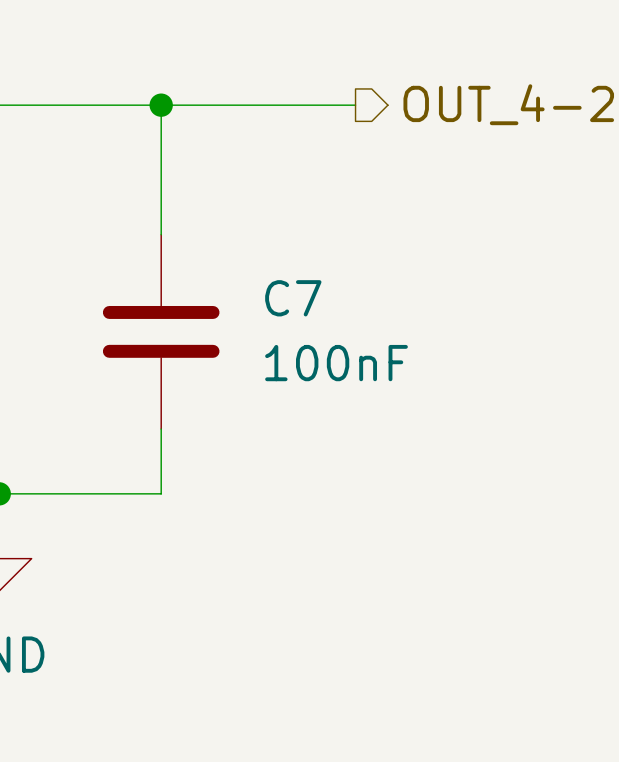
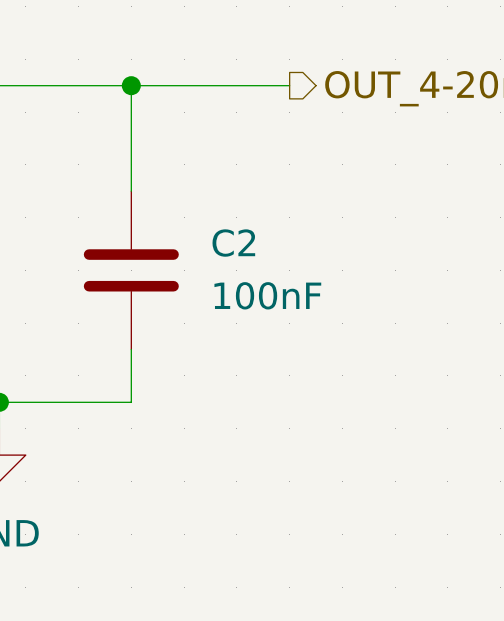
C7 name: C7 (293, 298) -> C2 (233, 243)

